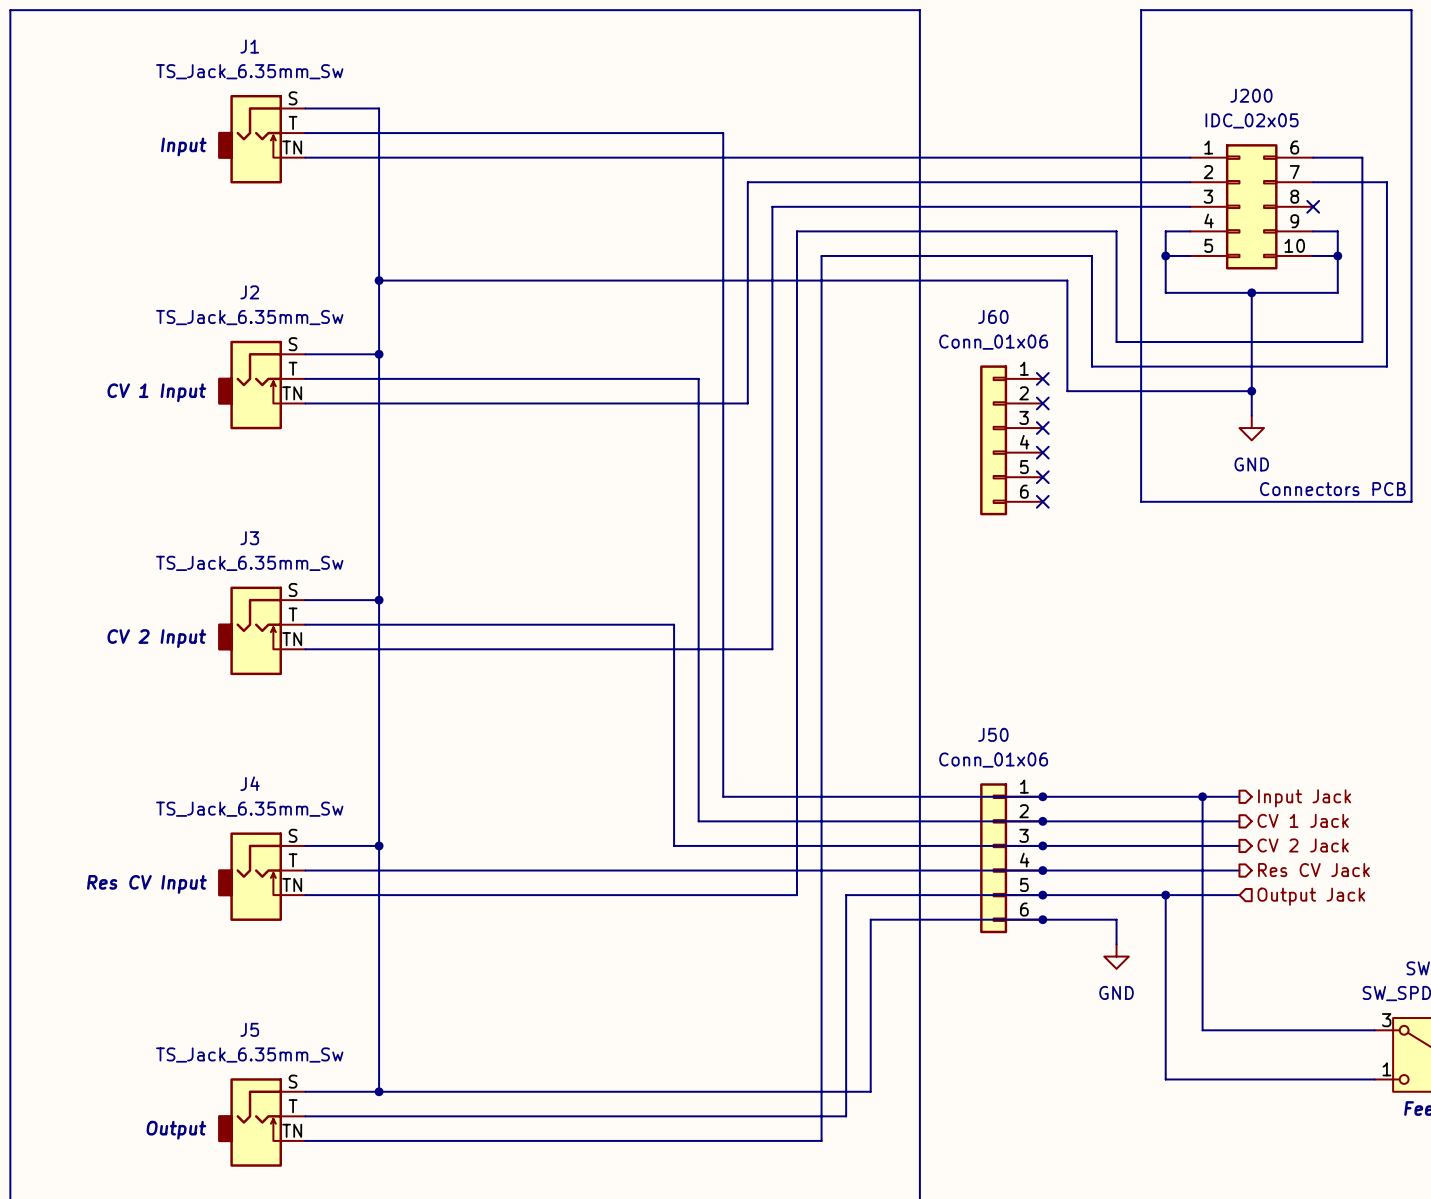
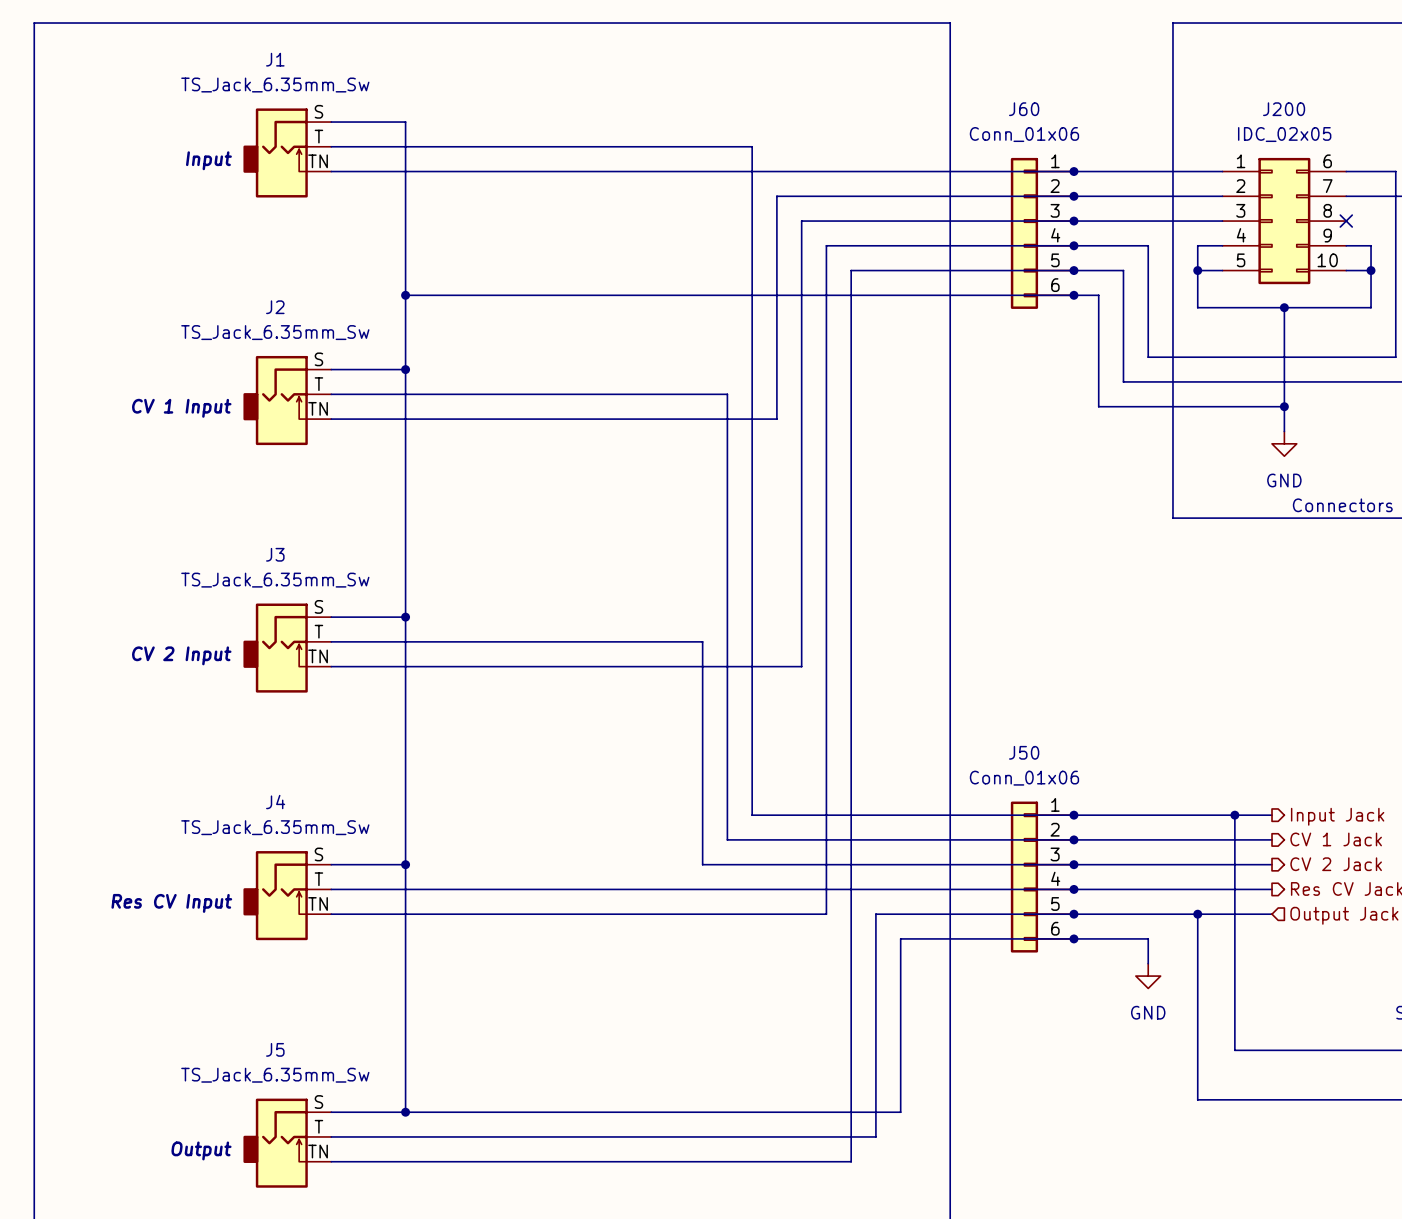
junction: none -> (1073, 171)
junction: none -> (1073, 196)
junction: none -> (1073, 221)
junction: none -> (1073, 245)
junction: none -> (1073, 270)
junction: none -> (1073, 295)
no-connect mark: (1042, 378) -> none
no-connect mark: (1042, 403) -> none
no-connect mark: (1042, 428) -> none
J60 position: (1011, 440) -> (1042, 233)
no-connect mark: (1042, 452) -> none
no-connect mark: (1042, 477) -> none
no-connect mark: (1042, 501) -> none

